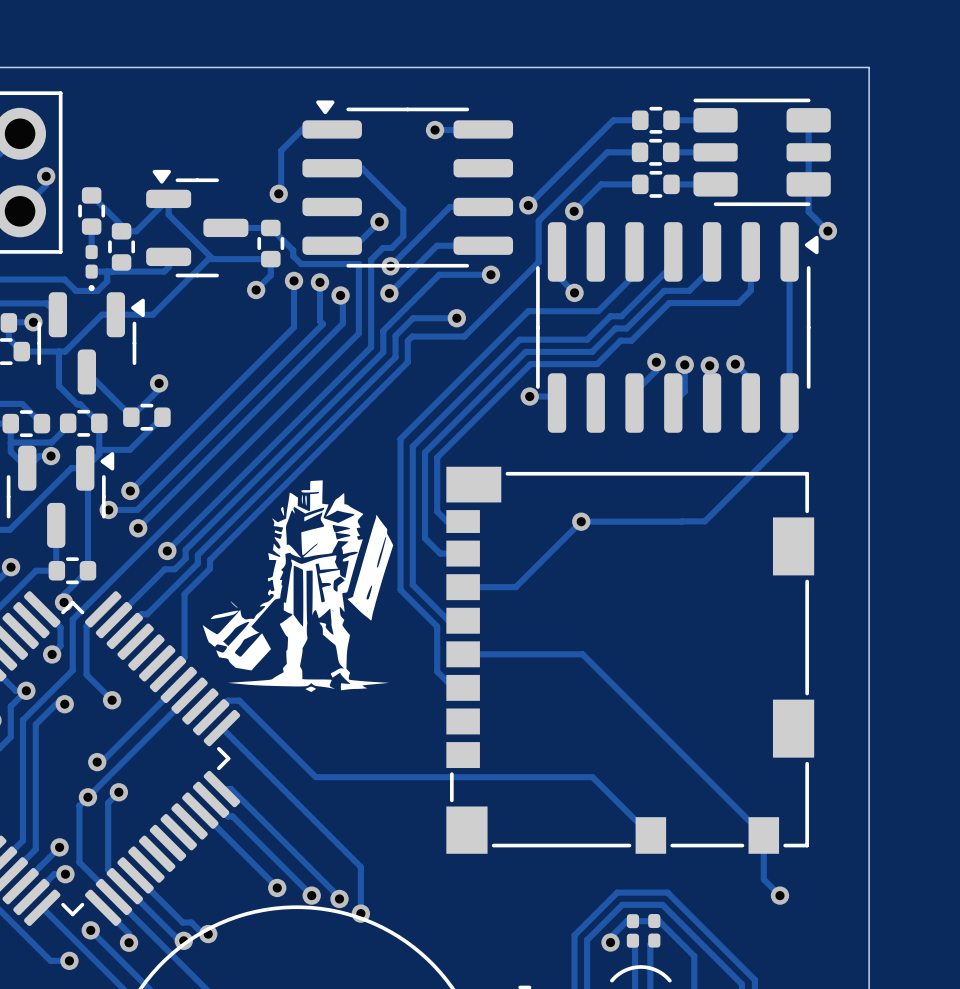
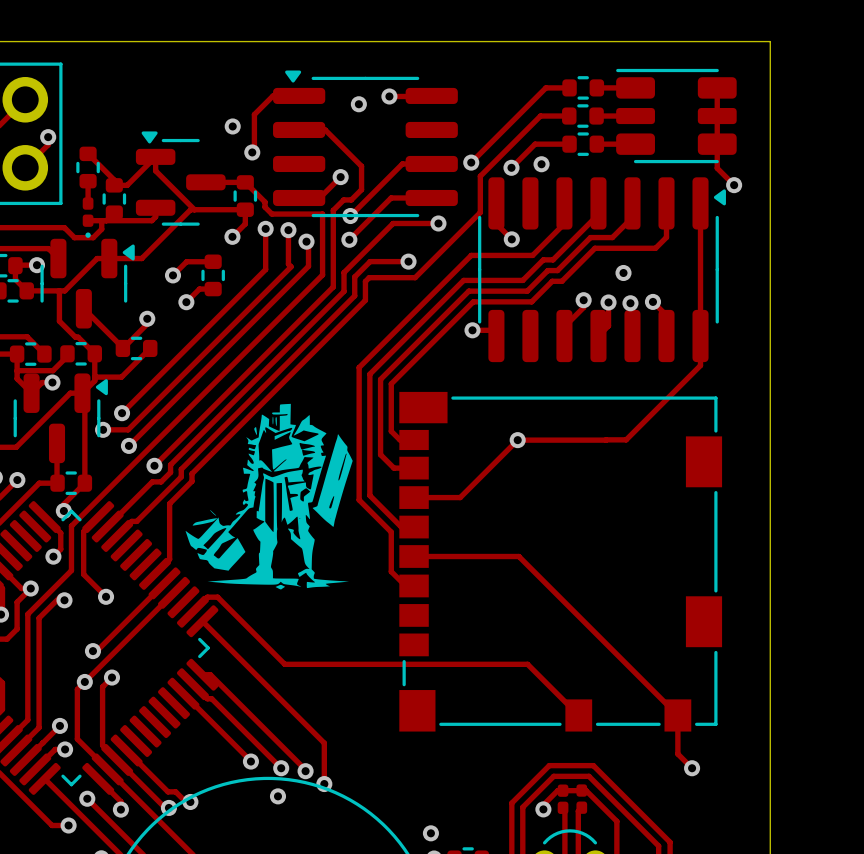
via: none -> (358, 104)
via: none -> (232, 126)
via: none -> (541, 164)
track: none -> (213, 261) (186, 261) (172, 275)
via: none -> (623, 272)
via: none -> (172, 275)
part: none -> (213, 275)
track: none -> (213, 289) (199, 289) (186, 302)
via: none -> (186, 302)
via: none -> (277, 796)
via: none -> (430, 833)

